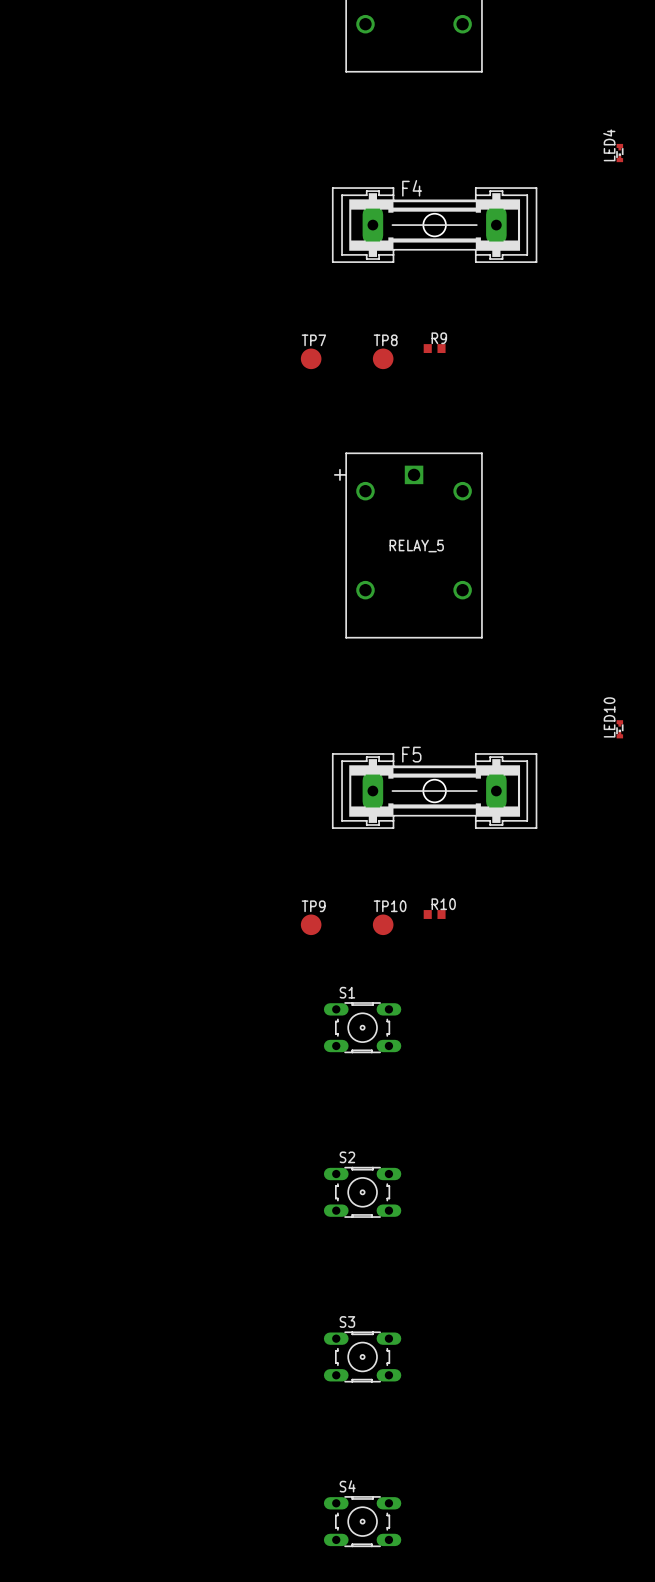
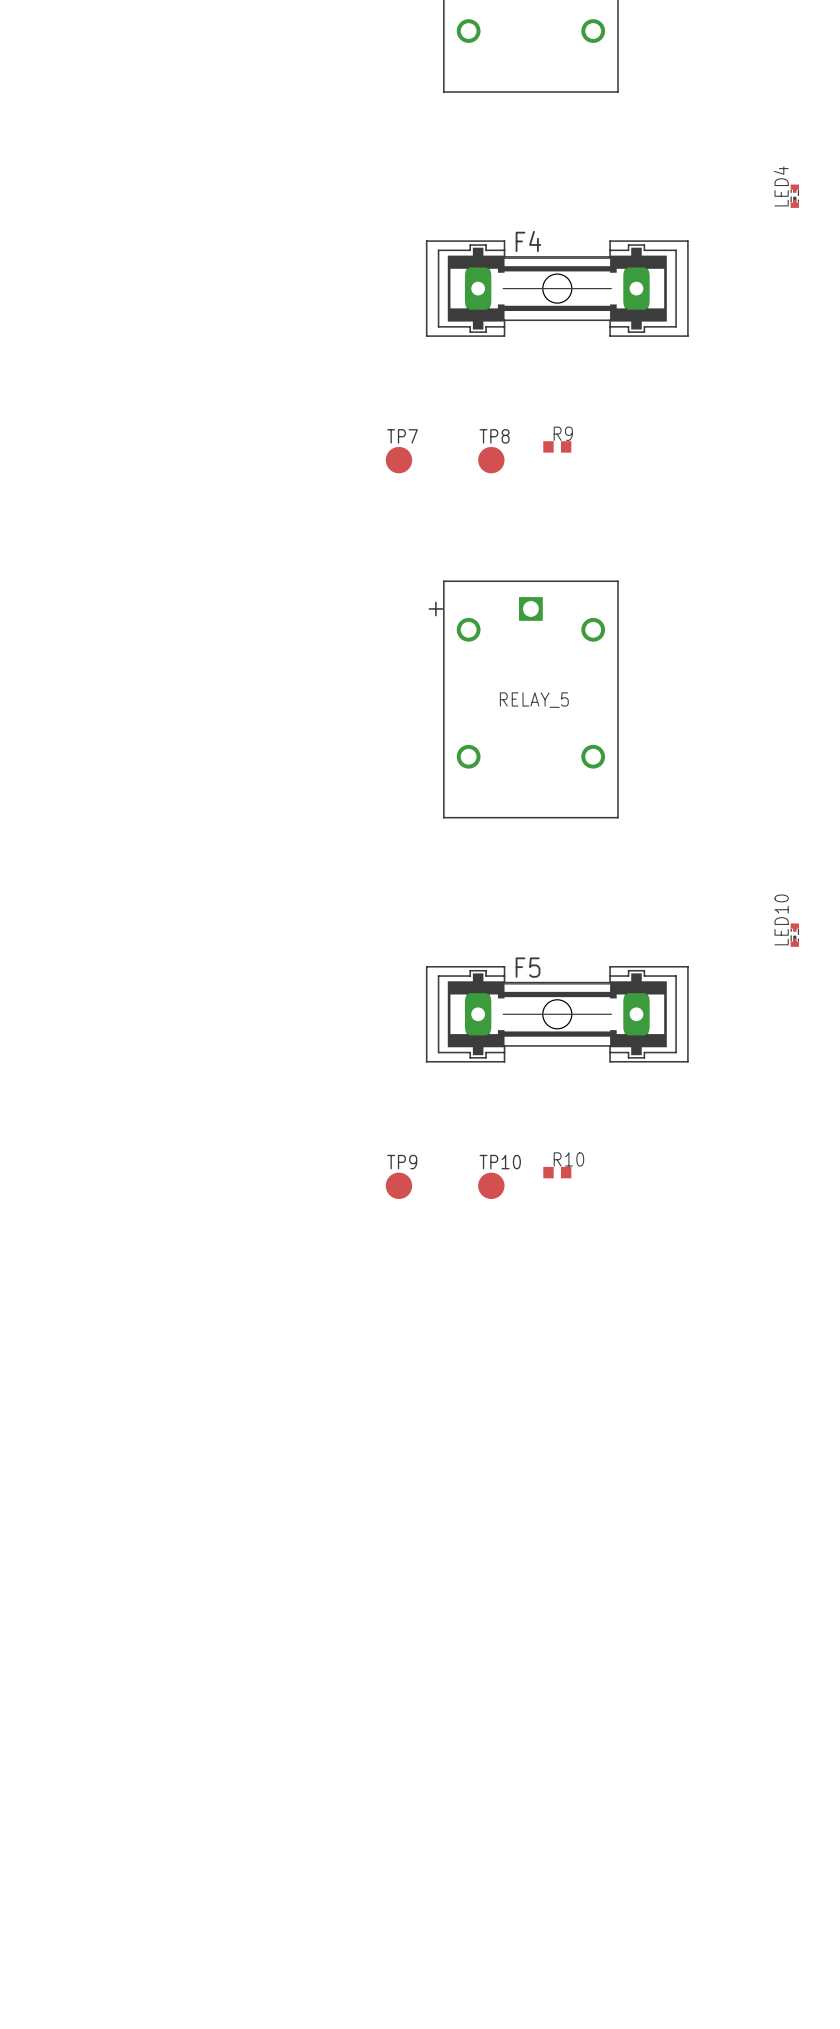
S1: (362, 1027) -> none
S2: (362, 1192) -> none
S3: (362, 1356) -> none
S4: (362, 1521) -> none

